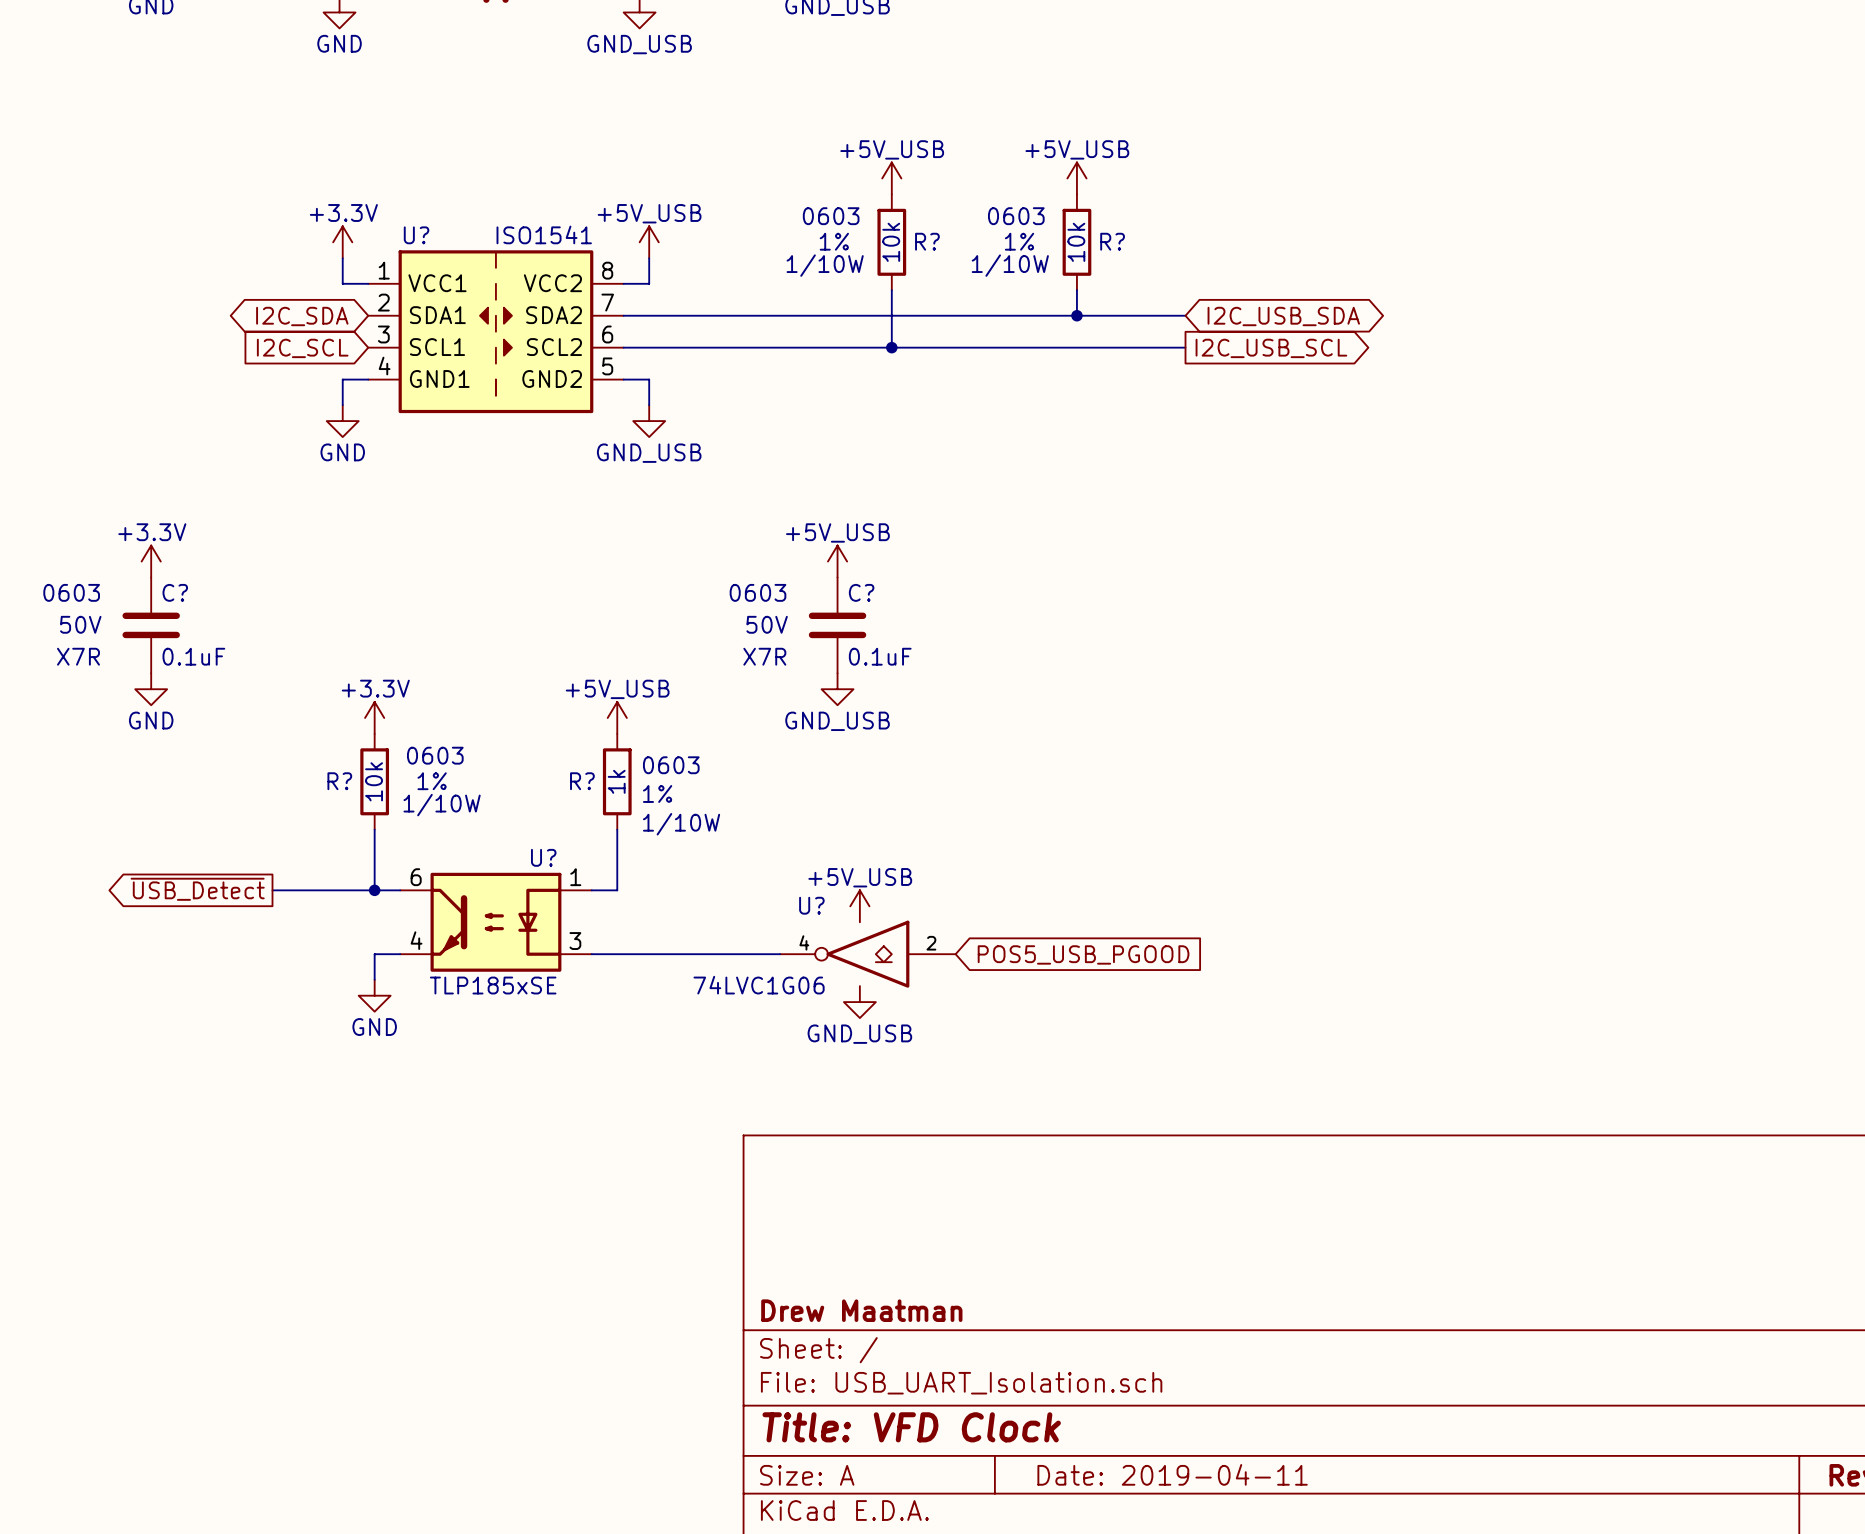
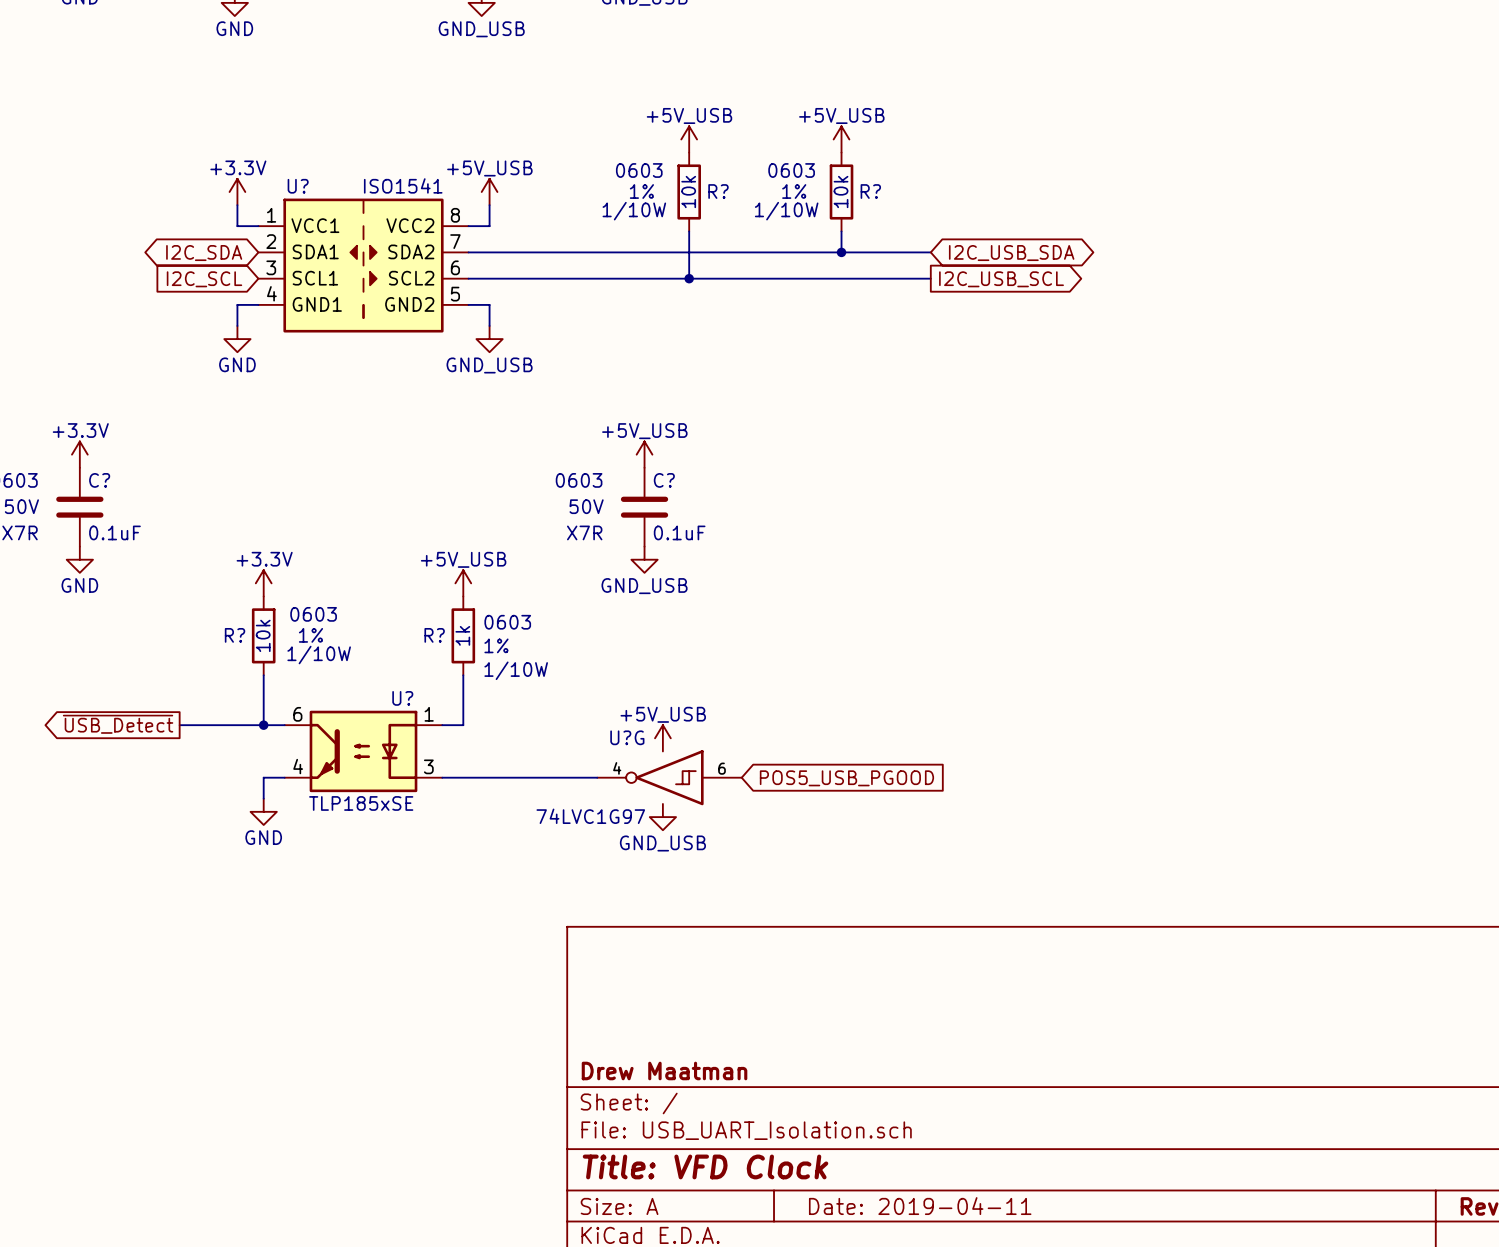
U?: 74LVC1G06 (867, 954) -> none
U?G: none -> 74LVC1G97 (669, 777)

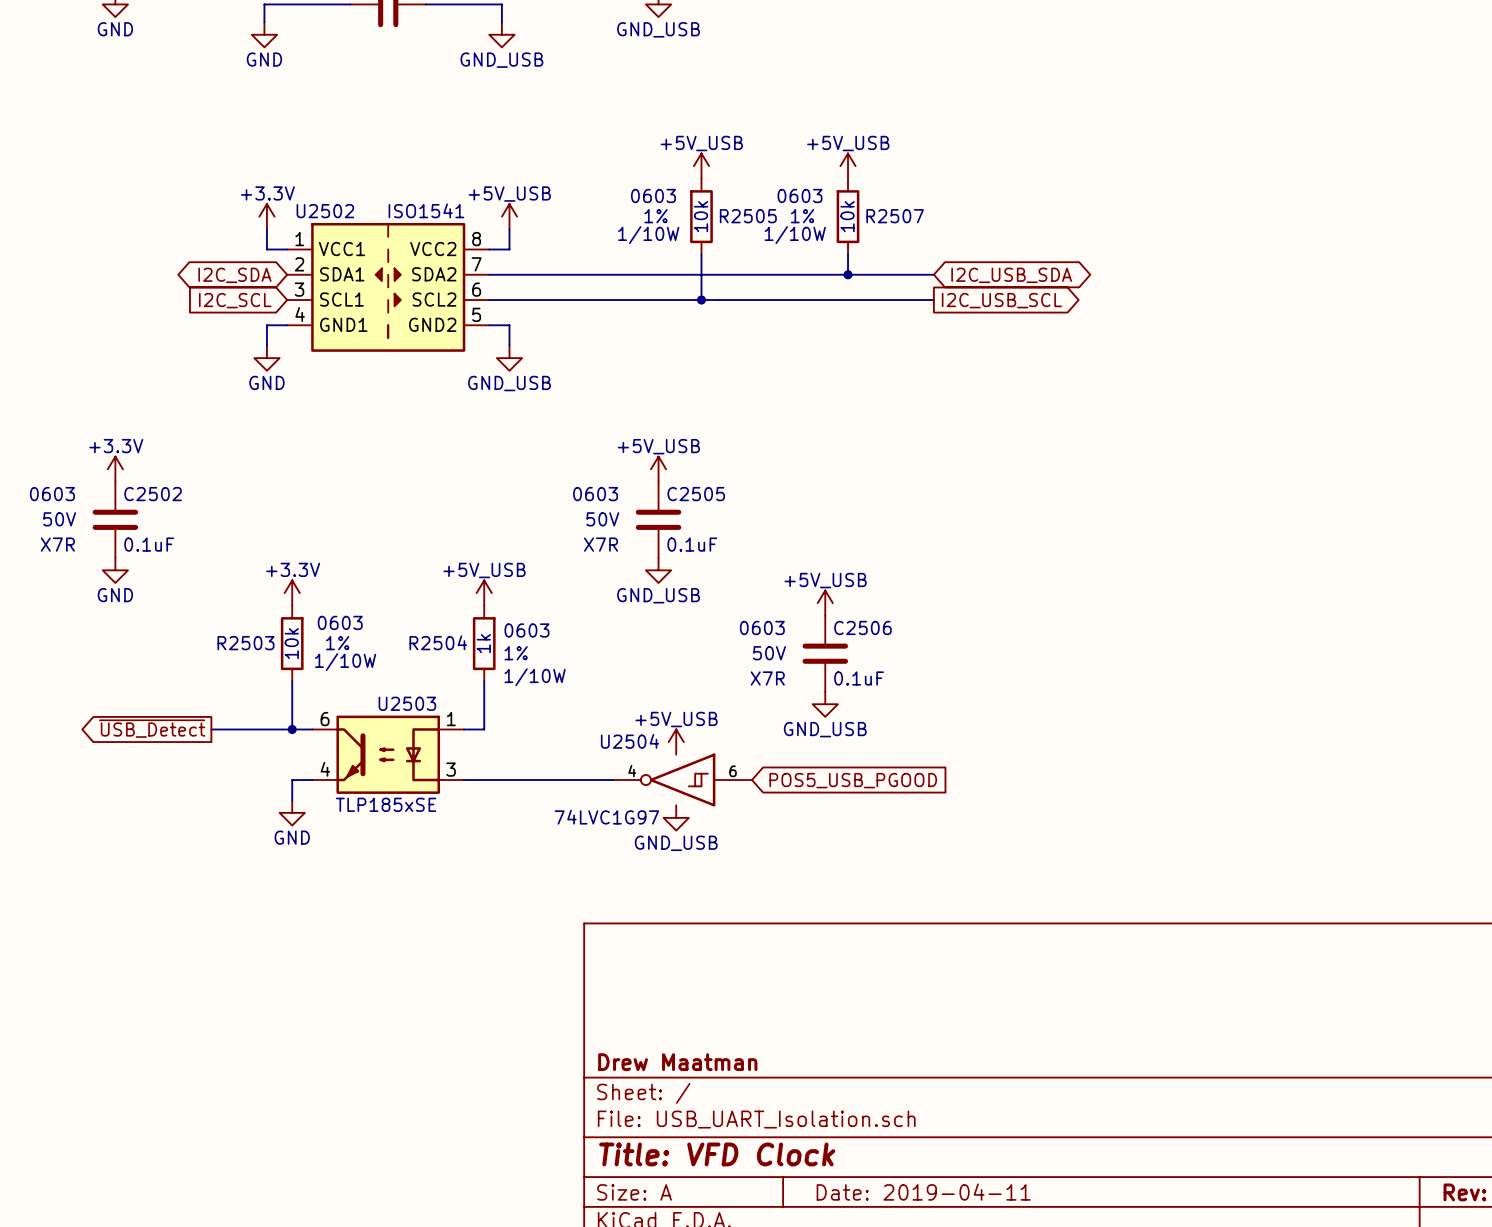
U? name: U? (298, 186) -> U2502 (325, 211)
R? name: R? (718, 191) -> R2505 (748, 216)
R? name: R? (870, 191) -> R2507 (895, 216)
C? name: C? (99, 480) -> C2502 (153, 494)
C? name: C? (664, 480) -> C2505 (696, 494)
power symbol: none -> +5V_USB (825, 603)
R? name: R? (235, 635) -> R2503 (245, 643)
R? name: R? (434, 635) -> R2504 (438, 642)
C2506: none -> 0.1uF (825, 653)
U? name: U? (402, 698) -> U2503 (407, 703)
power symbol: none -> GND_USB (825, 704)
U?G name: U?G (627, 737) -> U2504 (629, 741)

